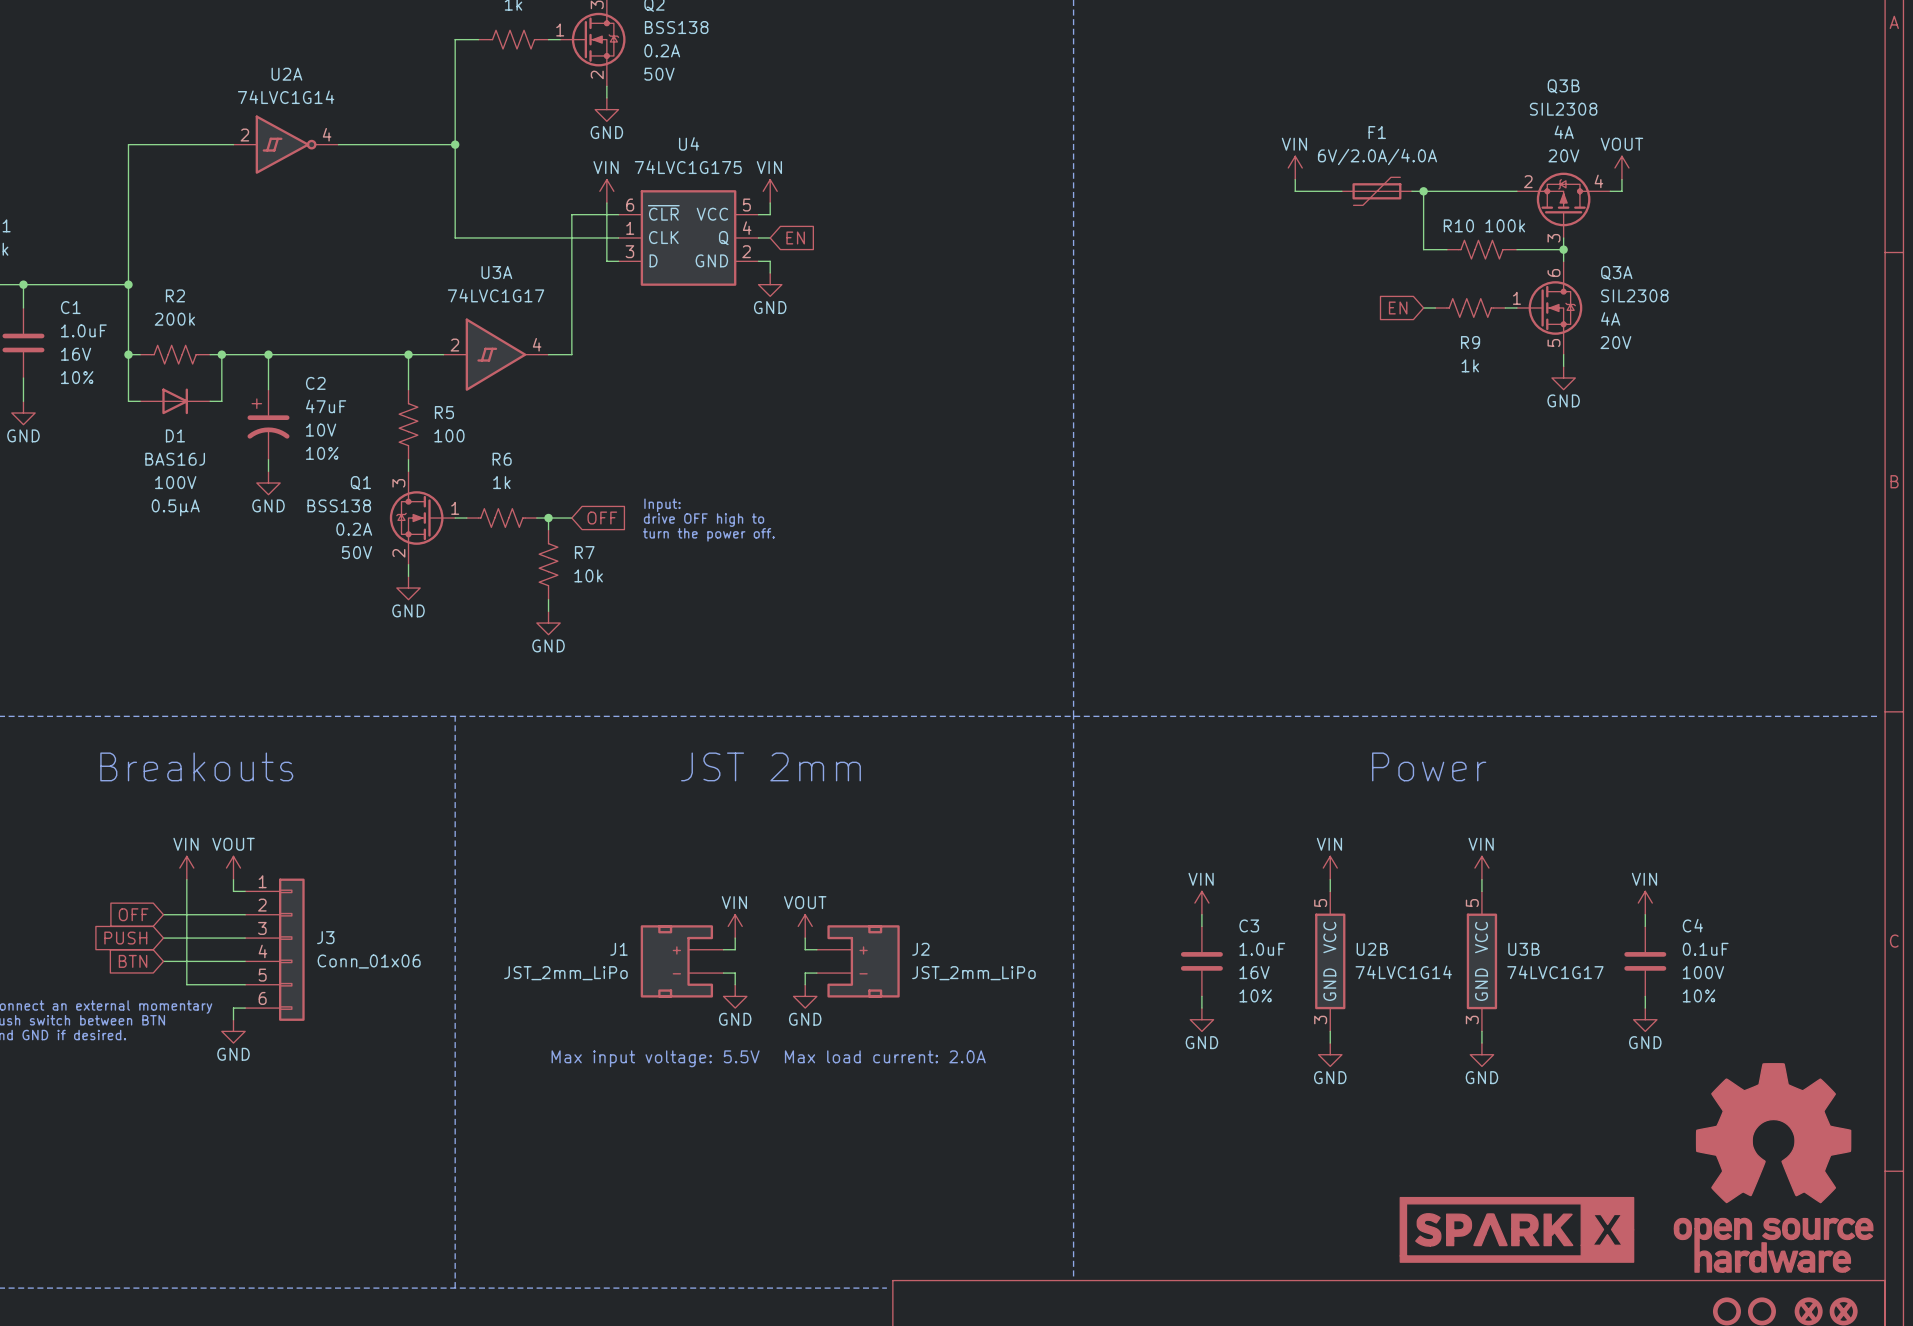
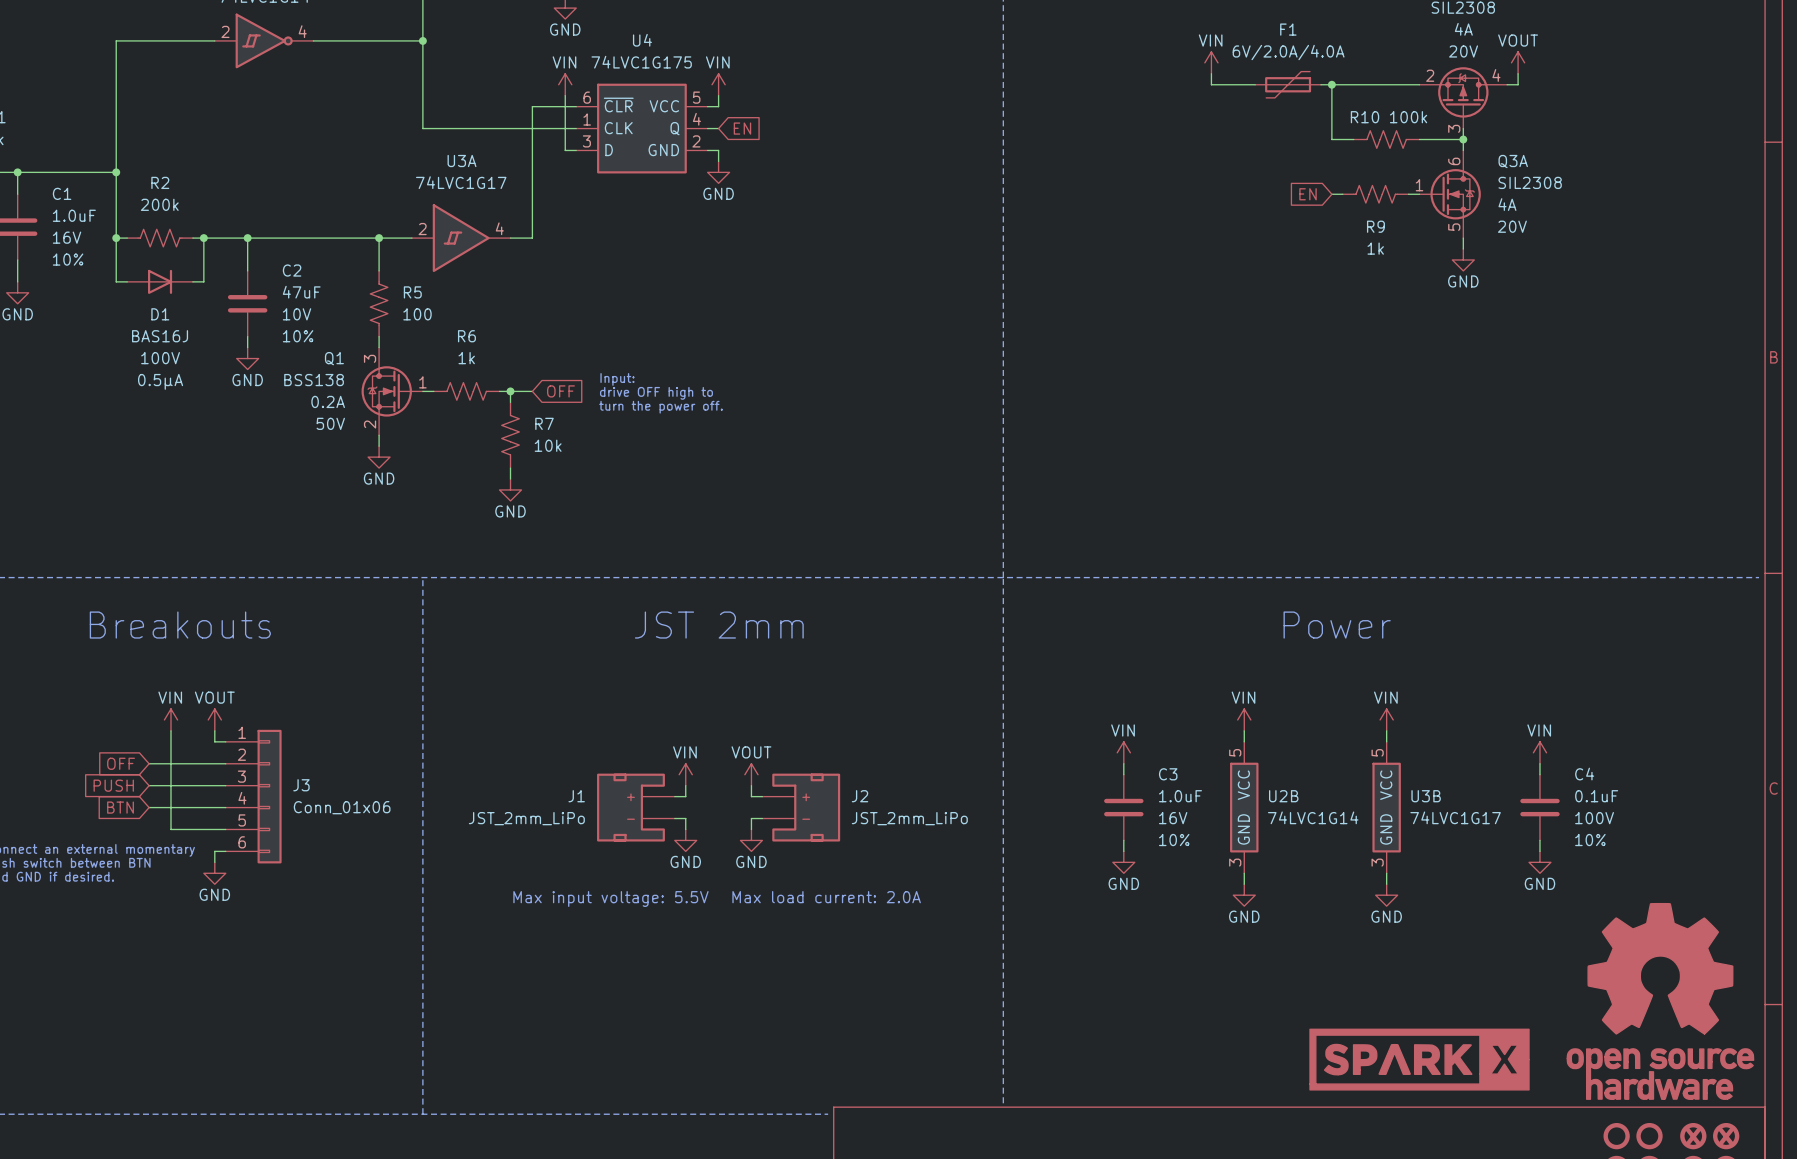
C2 symbol: [247, 389, 290, 460] -> [227, 270, 268, 337]

